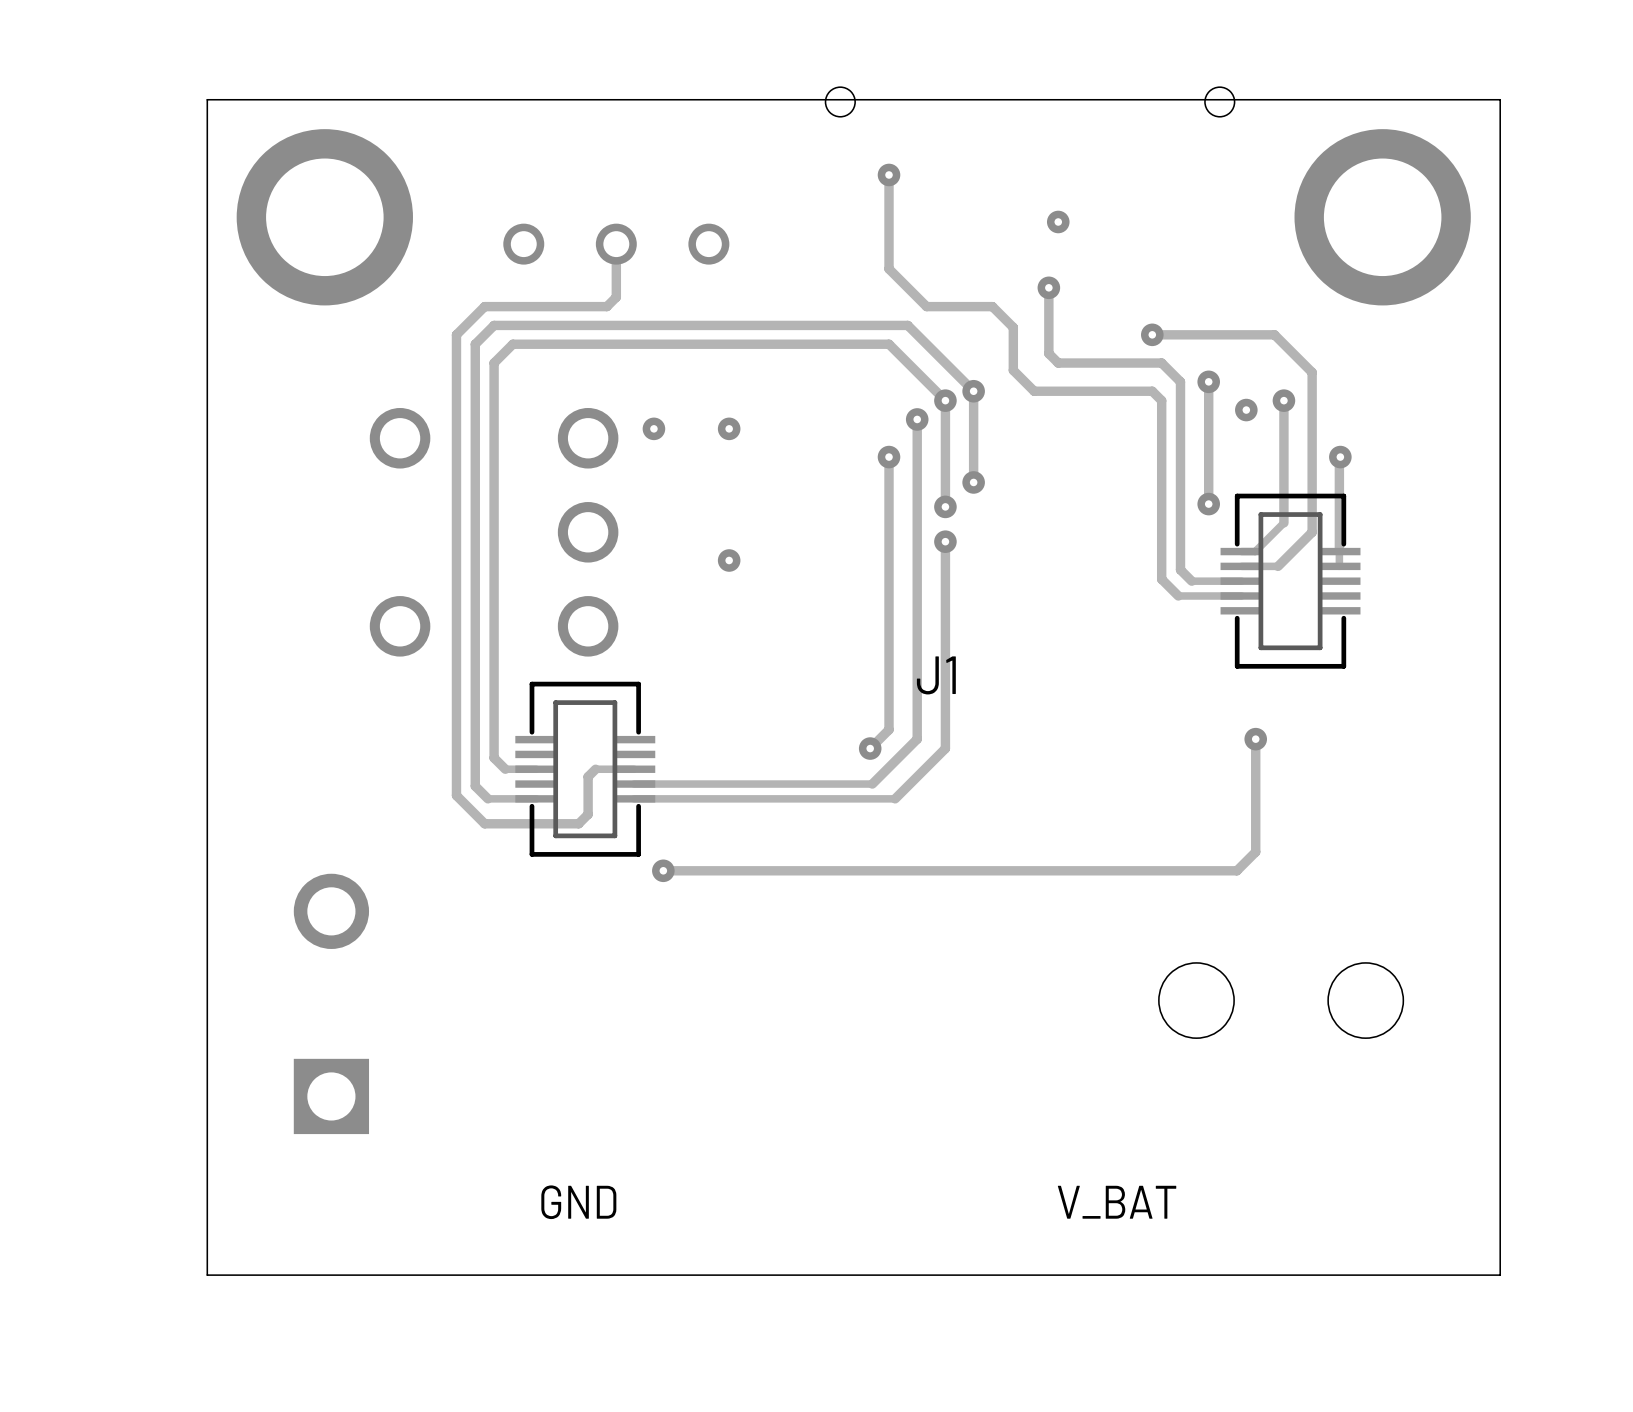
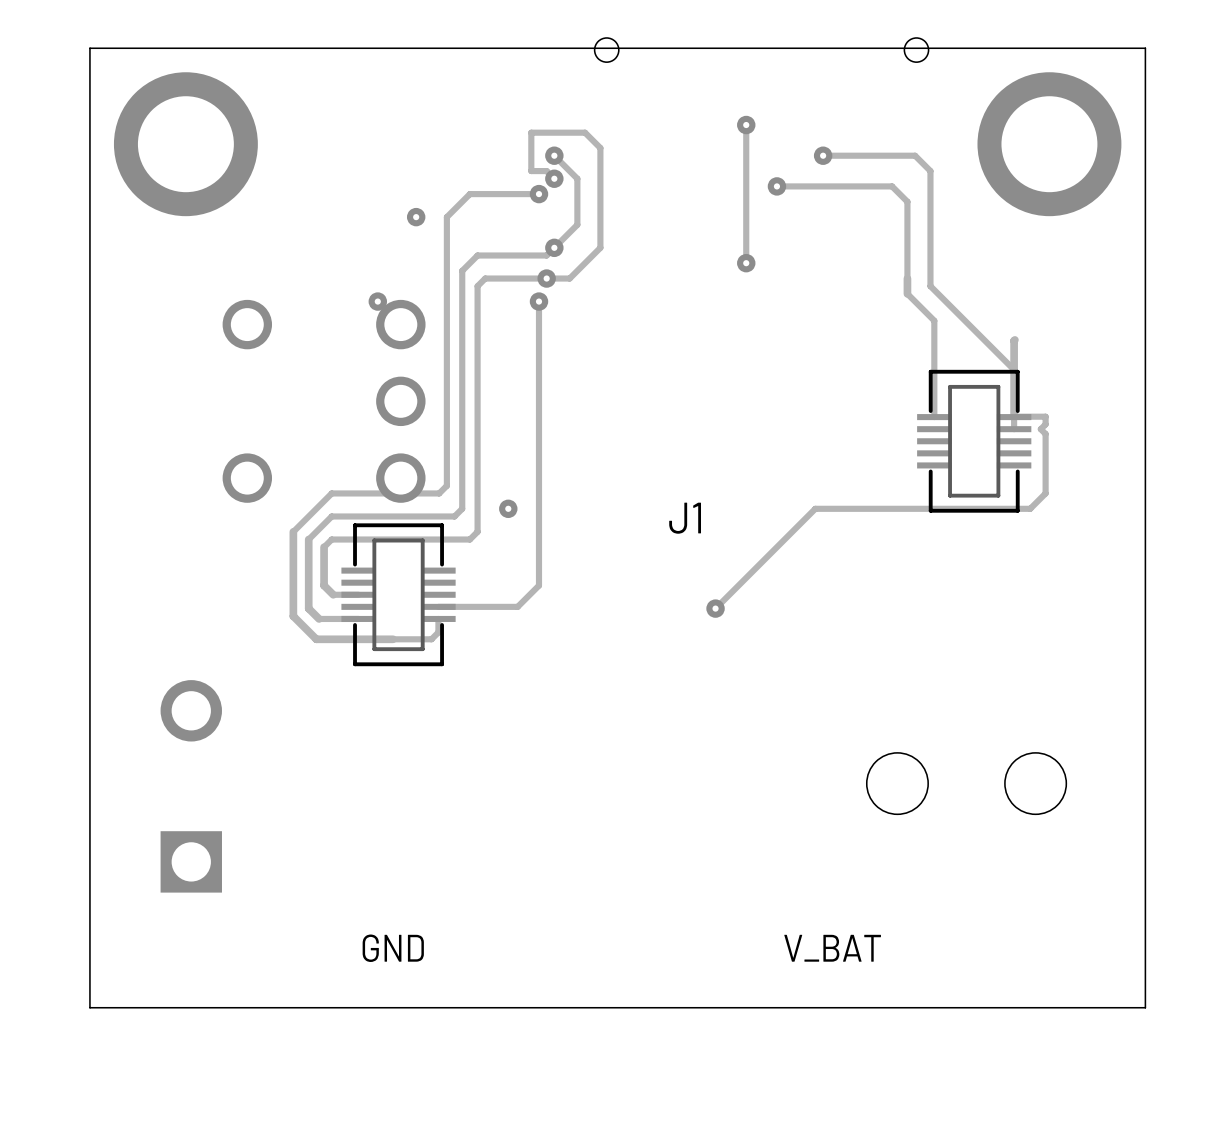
track: (889, 174) (889, 269) (926, 306) (992, 306) (1013, 327) (1013, 370) (1034, 391) (1152, 391) (1161, 400) (1161, 579) (1178, 595) (1241, 595) -> none
via: (889, 174) -> none
track: none -> (746, 125) (746, 263)
via: none -> (746, 125)
via: (1058, 221) -> none
via: none -> (554, 155)
track: none -> (823, 155) (915, 155) (930, 171) (930, 286) (1014, 370) (1014, 416) (1045, 416) (1045, 424) (1040, 429) (1045, 433) (1045, 493) (1030, 508) (815, 508) (715, 608)
via: none -> (823, 155)
track: (616, 244) (616, 297) (606, 306) (484, 306) (456, 334) (456, 692) -> (538, 194) (469, 194) (446, 217) (446, 485) (439, 493) (331, 493) (293, 531)
part: (616, 244) -> none
via: none -> (554, 178)
track: none -> (776, 186) (892, 186) (907, 201) (907, 278)
via: none -> (538, 194)
track: (1048, 287) (1048, 353) (1058, 363) (1161, 363) (1180, 381) (1180, 569) (1191, 581) (1241, 581) -> none
via position: (1048, 287) -> (776, 186)
via: none -> (416, 217)
track: (1152, 334) (1274, 334) (1312, 372) (1312, 532) (1278, 566) (1241, 566) -> none
via: (1152, 334) -> none
via: none -> (554, 247)
via: none -> (746, 263)
via: none -> (546, 278)
via: (1208, 381) -> none
via: (973, 391) -> none
via: (945, 400) -> none
track: (1208, 400) (1208, 504) -> (907, 293) (934, 320) (934, 417)
track: (1283, 400) (1283, 522) (1255, 551) (1241, 551) -> none
via: (1283, 400) -> none
via: none -> (377, 301)
via: none -> (538, 301)
via: (1246, 410) -> none
track: (917, 419) (917, 739) (872, 784) (731, 784) -> (538, 301) (538, 585) (517, 606)
via: (917, 419) -> none
via: (653, 428) -> none
via: (729, 428) -> none
track: (889, 457) (889, 729) (870, 748) -> none
via: (889, 457) -> none
via: (1340, 457) -> none
track: (973, 482) (973, 391) (907, 325) (494, 325) (475, 344) (475, 701) -> (554, 155) (577, 178) (577, 224) (546, 255) (477, 255) (462, 270) (462, 508) (454, 516) (331, 516) (308, 539)
via: (973, 482) -> none
via: (1208, 504) -> none
track: (945, 506) (945, 400) (889, 344) (512, 344) (494, 363) (494, 710) -> (554, 178) (546, 171) (531, 171) (531, 132) (585, 132) (600, 148) (600, 247) (569, 278) (485, 278) (477, 286) (477, 531) (469, 539) (331, 539) (324, 547)
via: (945, 506) -> none
track: (945, 541) (945, 748) (895, 798) (634, 798) -> none
via: (945, 541) -> none
via: (729, 560) -> none
via: none -> (508, 508)
track: (1255, 739) (1255, 851) (1236, 870) (663, 870) -> none
via: (1255, 739) -> none
via: (870, 748) -> none
track: (634, 769) (595, 769) (588, 776) (588, 814) (578, 823) -> (438, 618) (438, 632) (431, 639) (393, 639)
via: none -> (715, 608)
via: (663, 870) -> none

